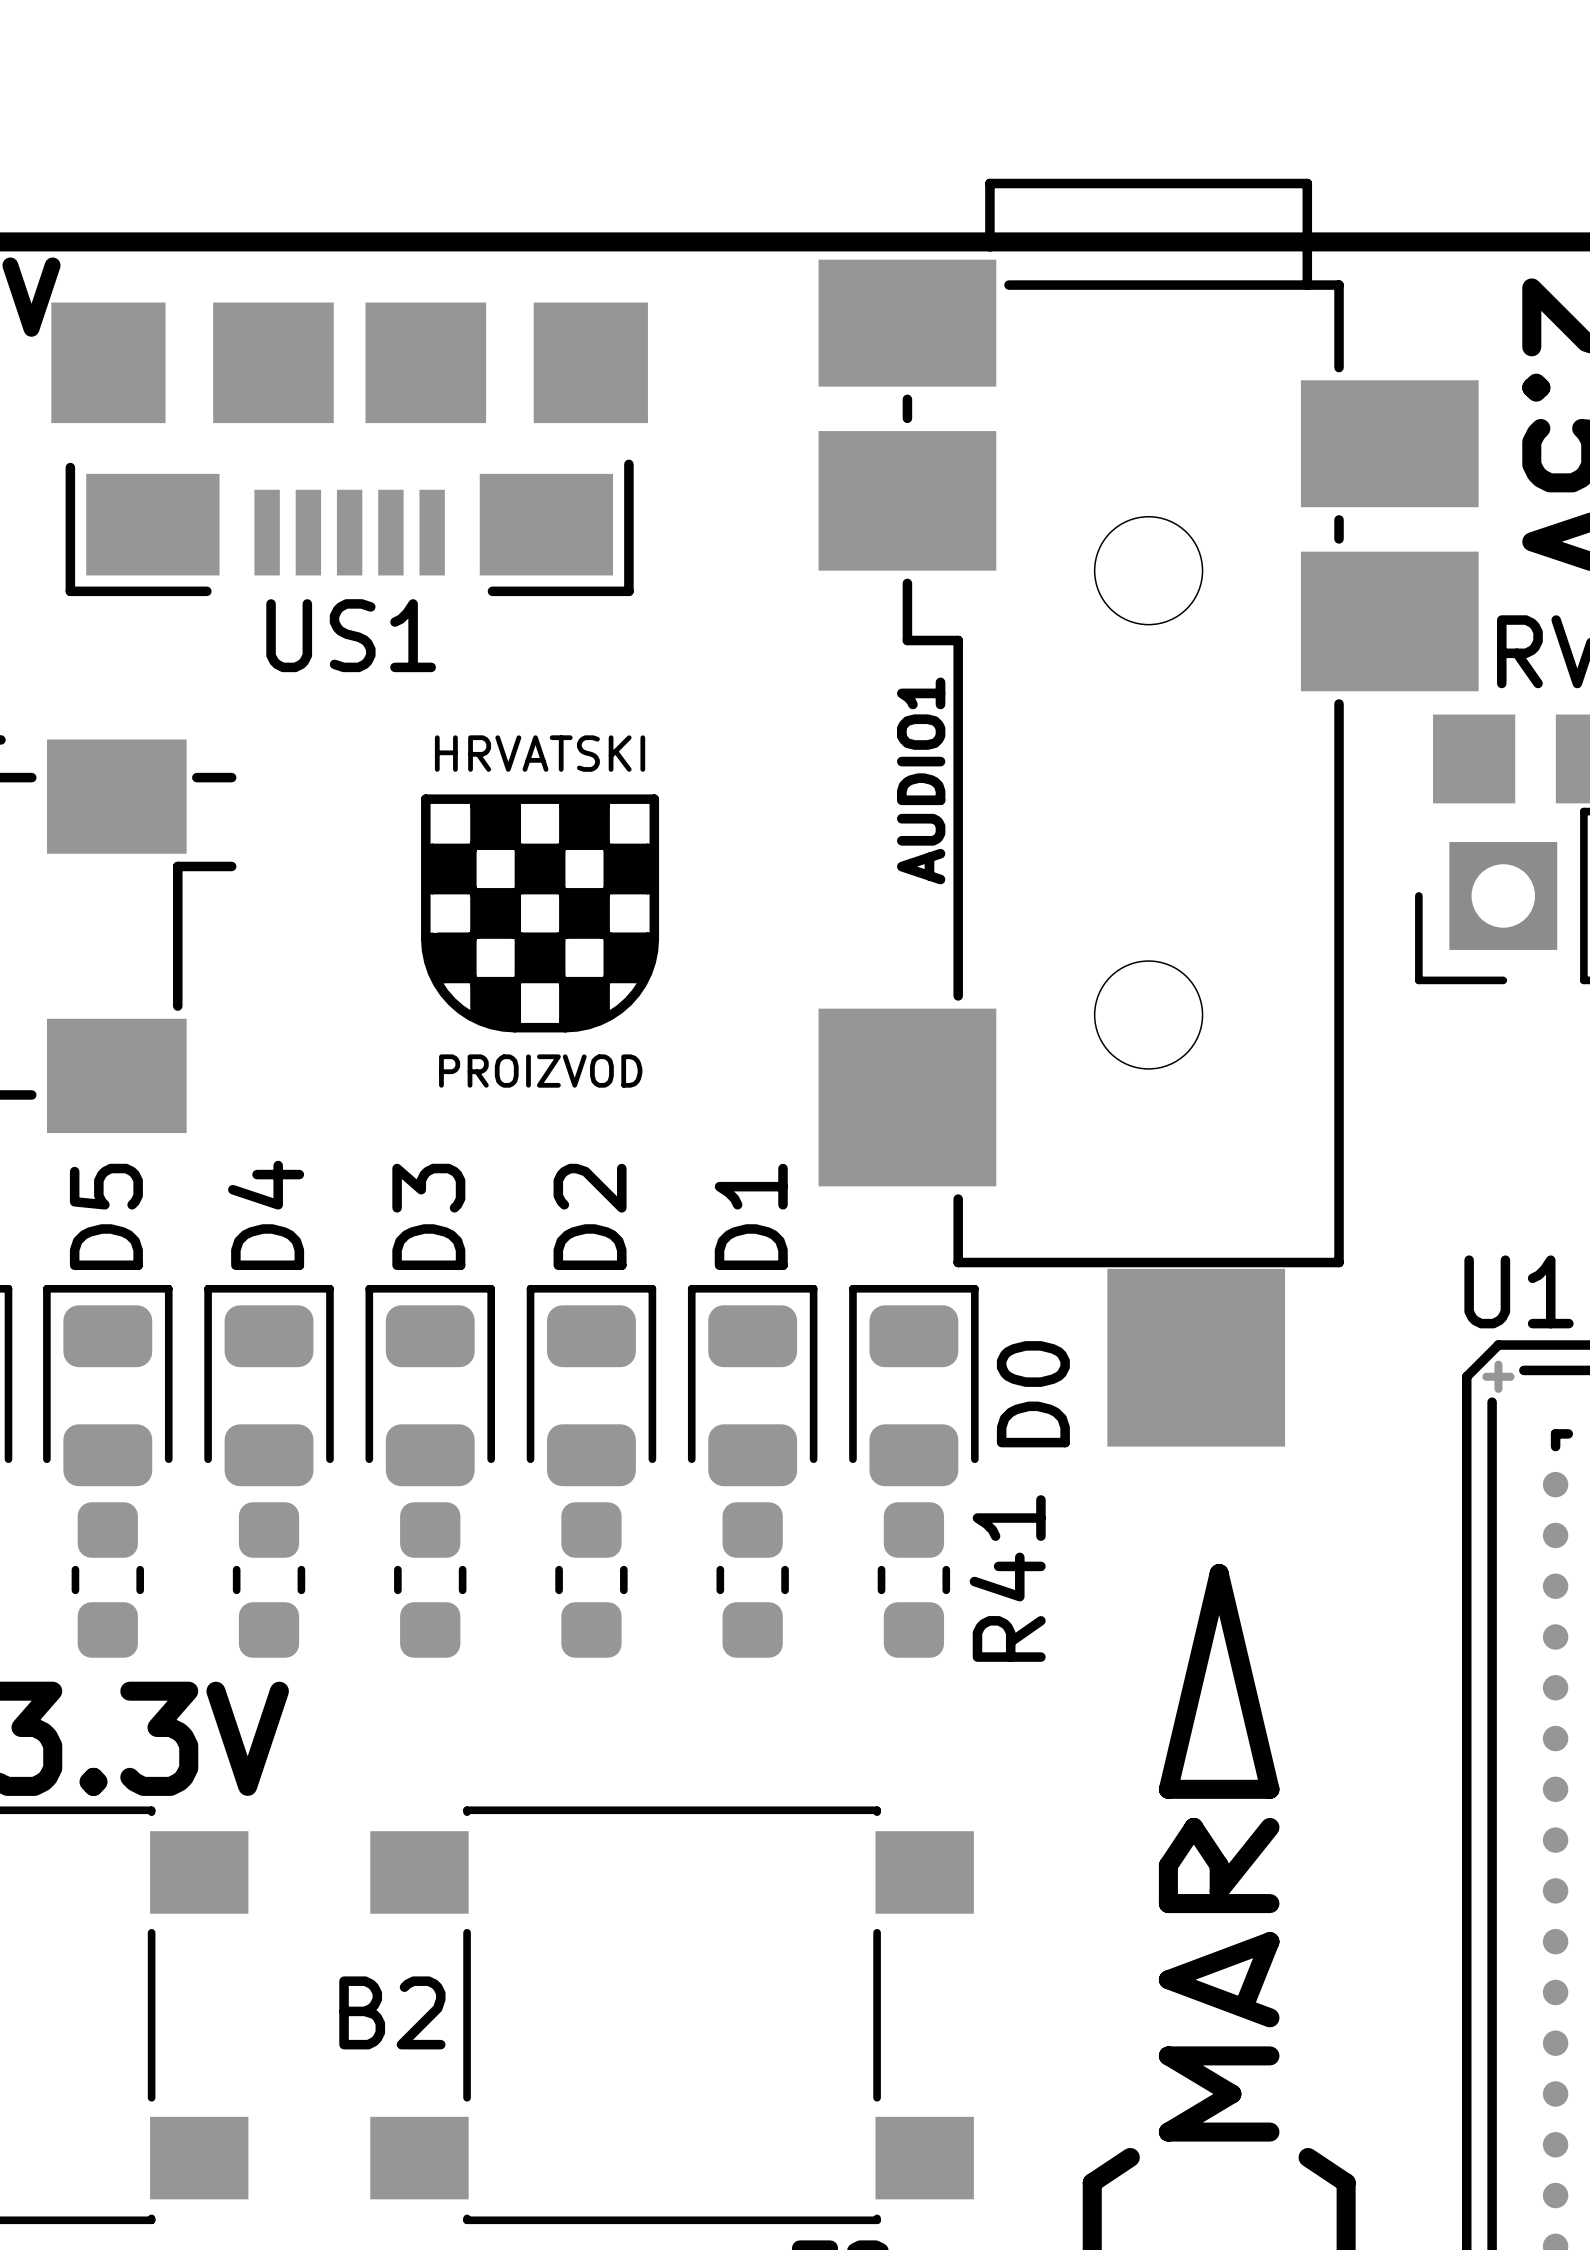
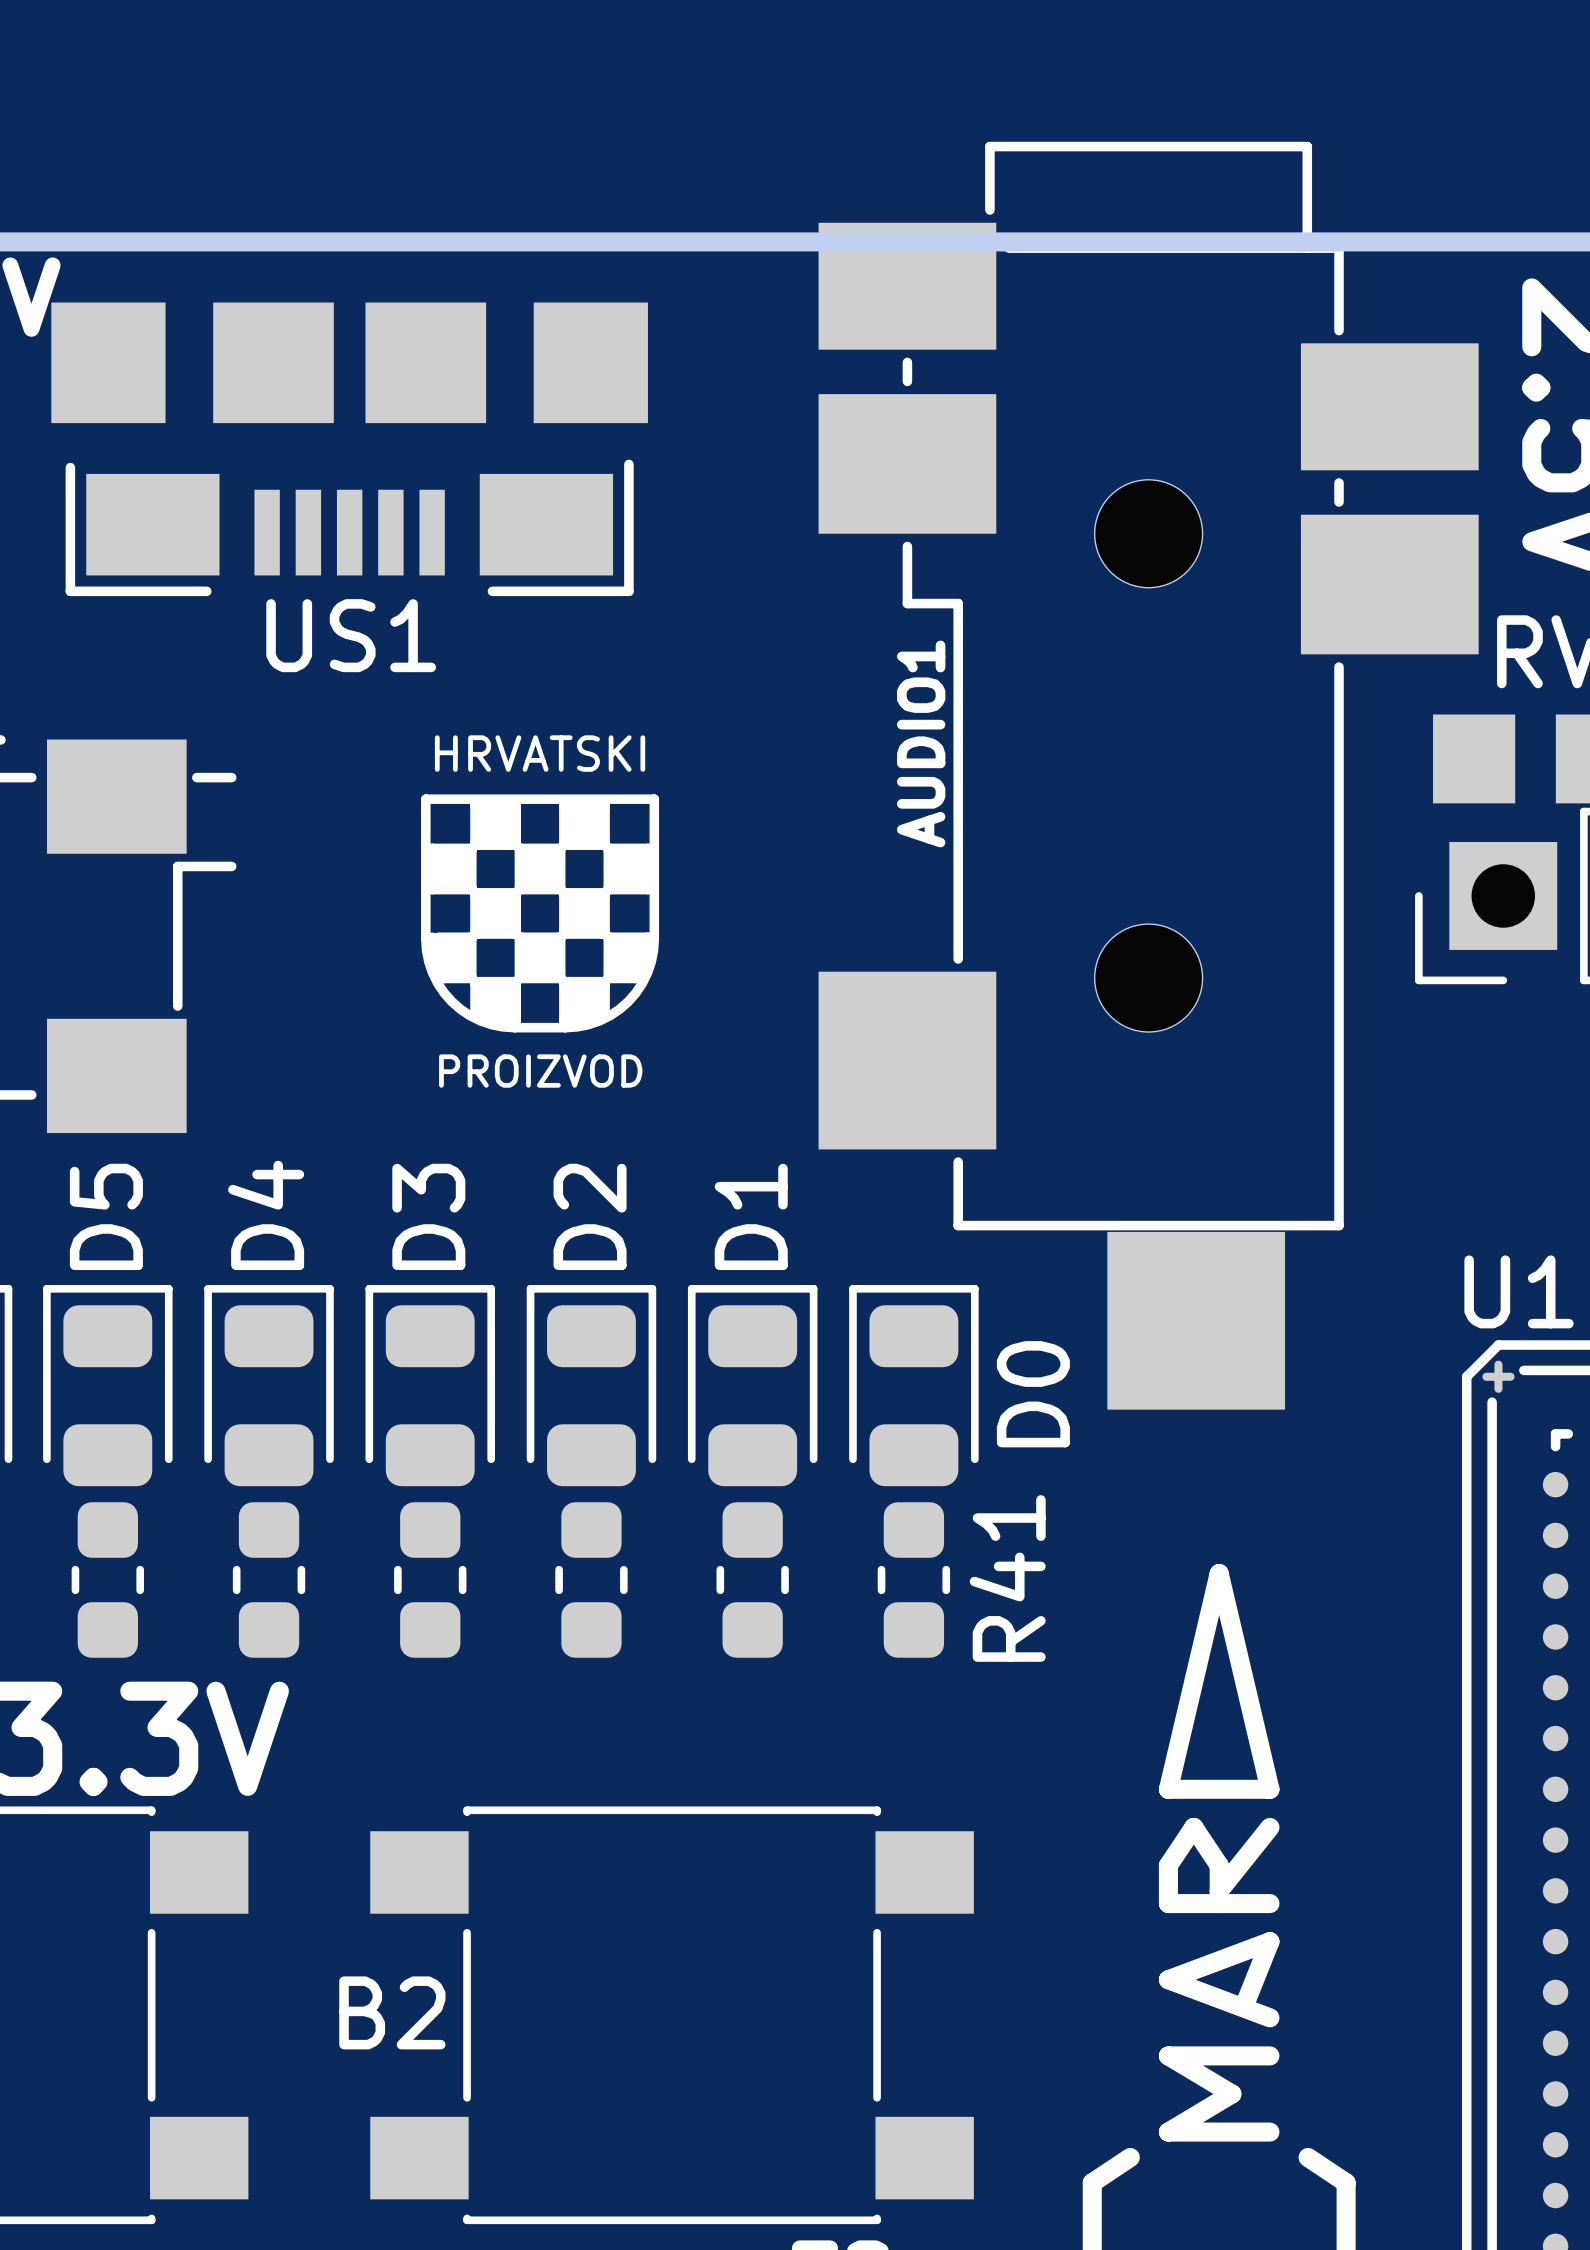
AUDIO1 position: (1148, 812) -> (1148, 775)

